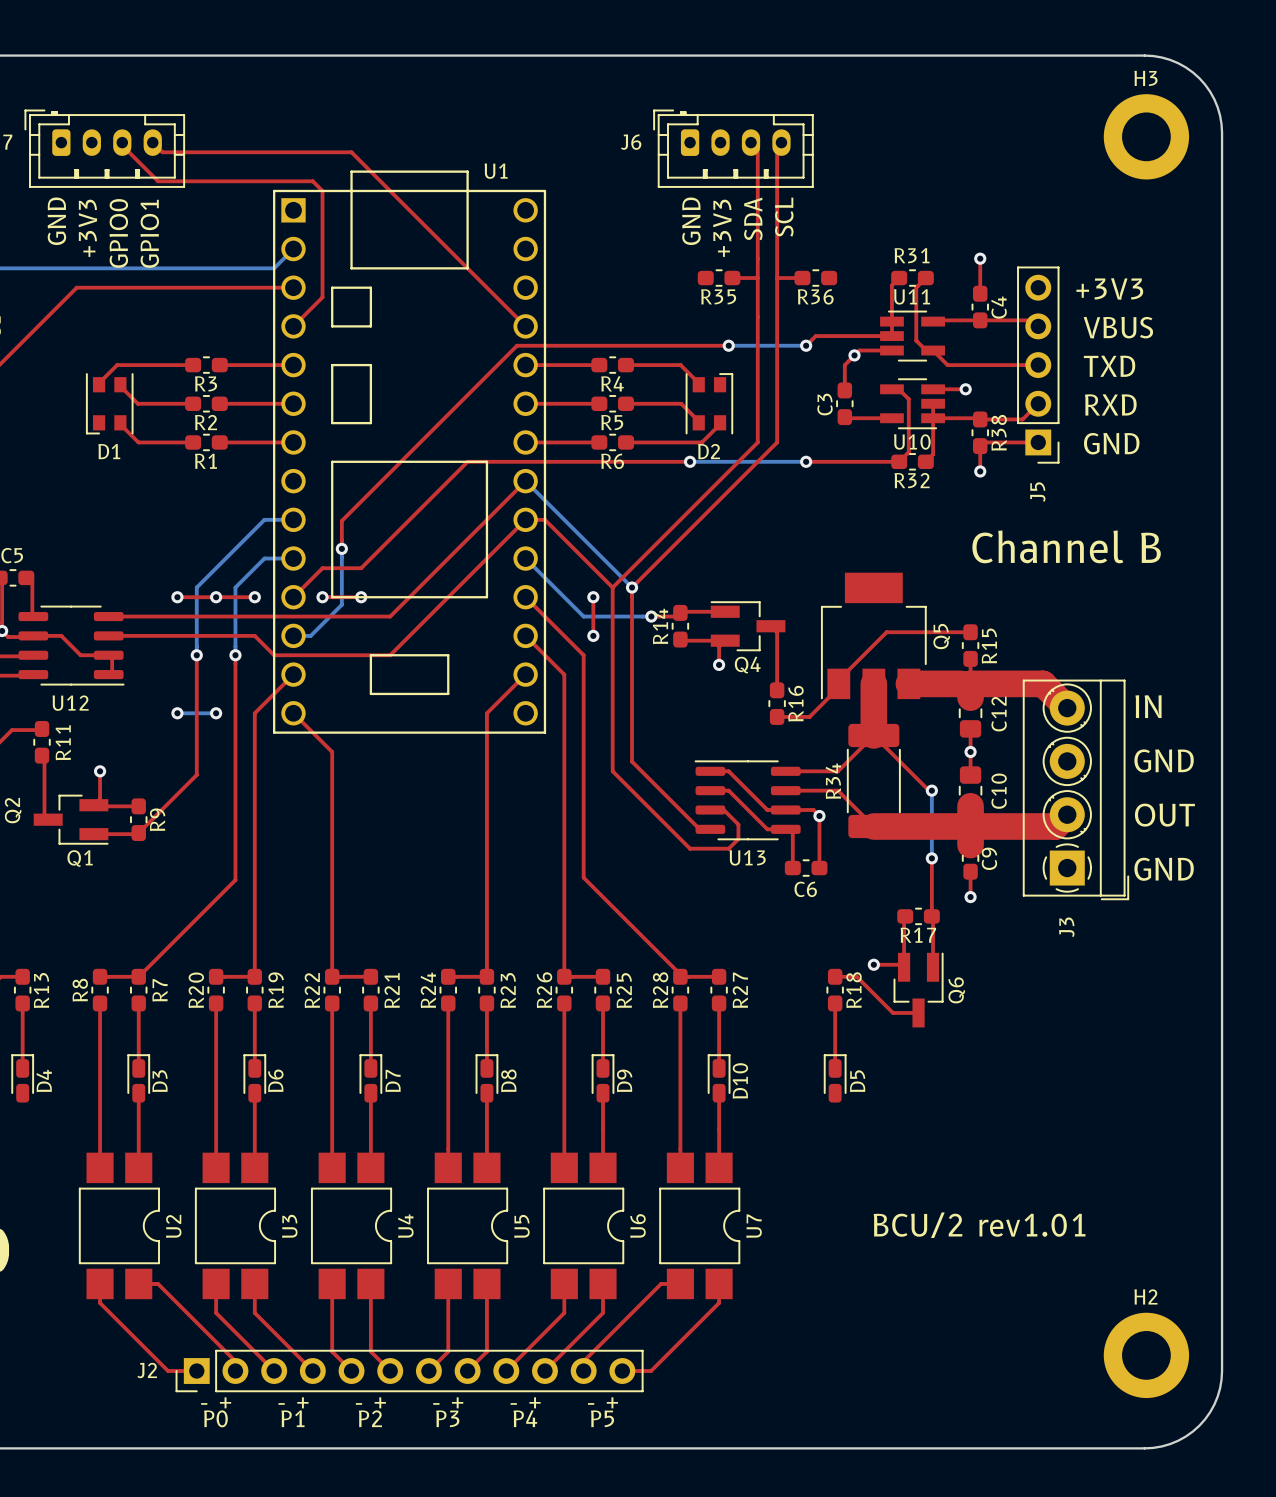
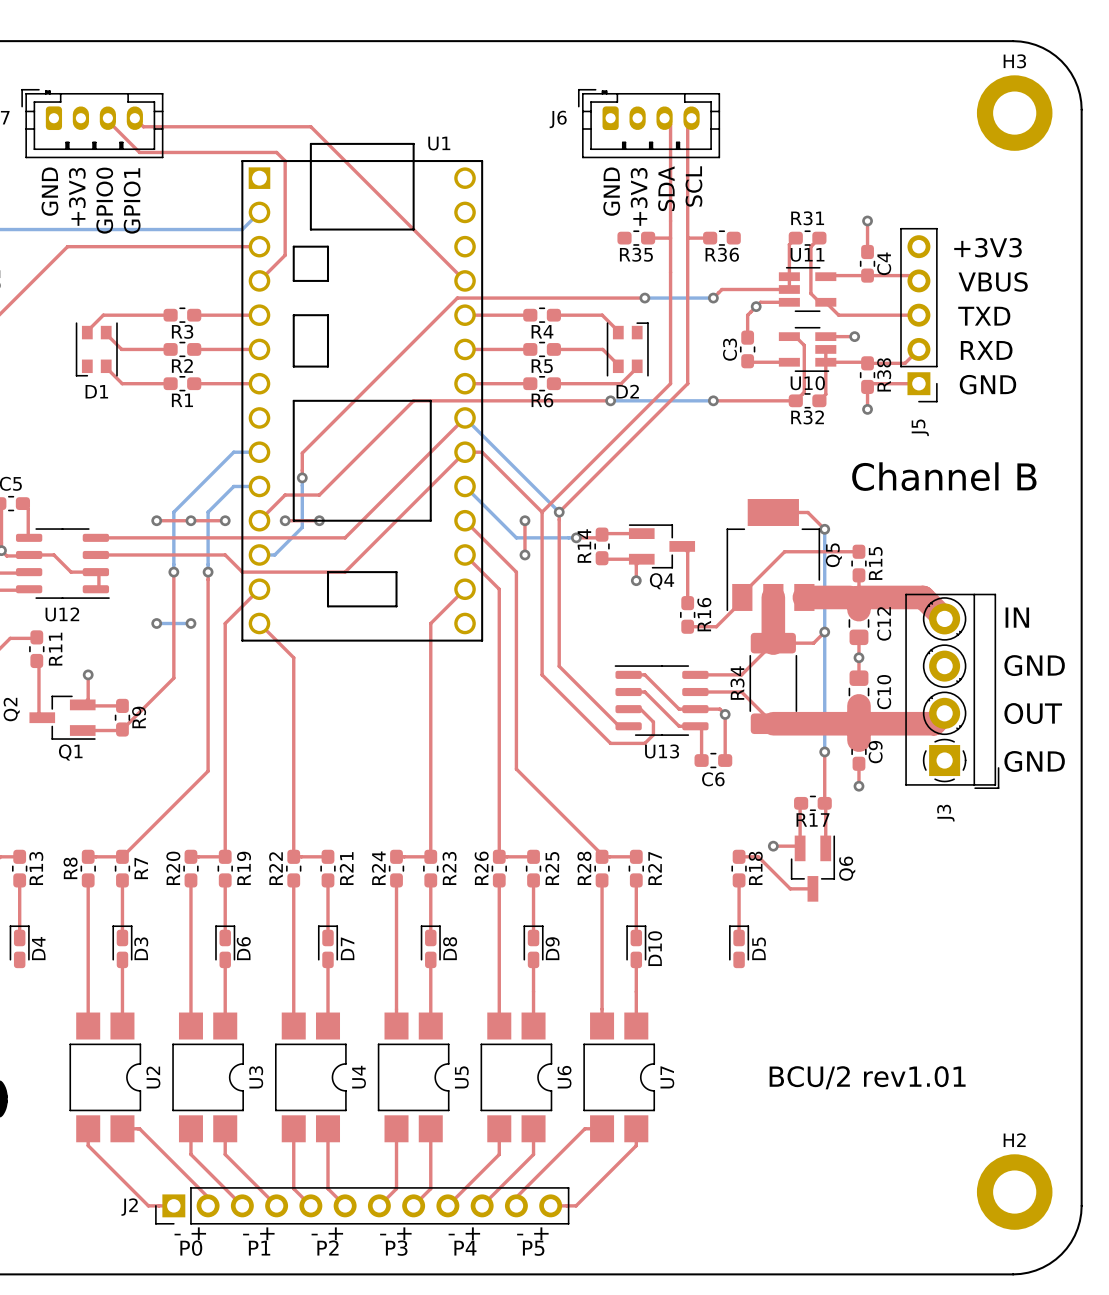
top track: none -> (773, 512) (807, 512) (824, 529)
bottom track: none -> (824, 529) (824, 692)
via: none -> (824, 529)
top track: (873, 735) (929, 790) (931, 790) -> (773, 643) (813, 643) (824, 632)
via position: (931, 790) -> (824, 632)

